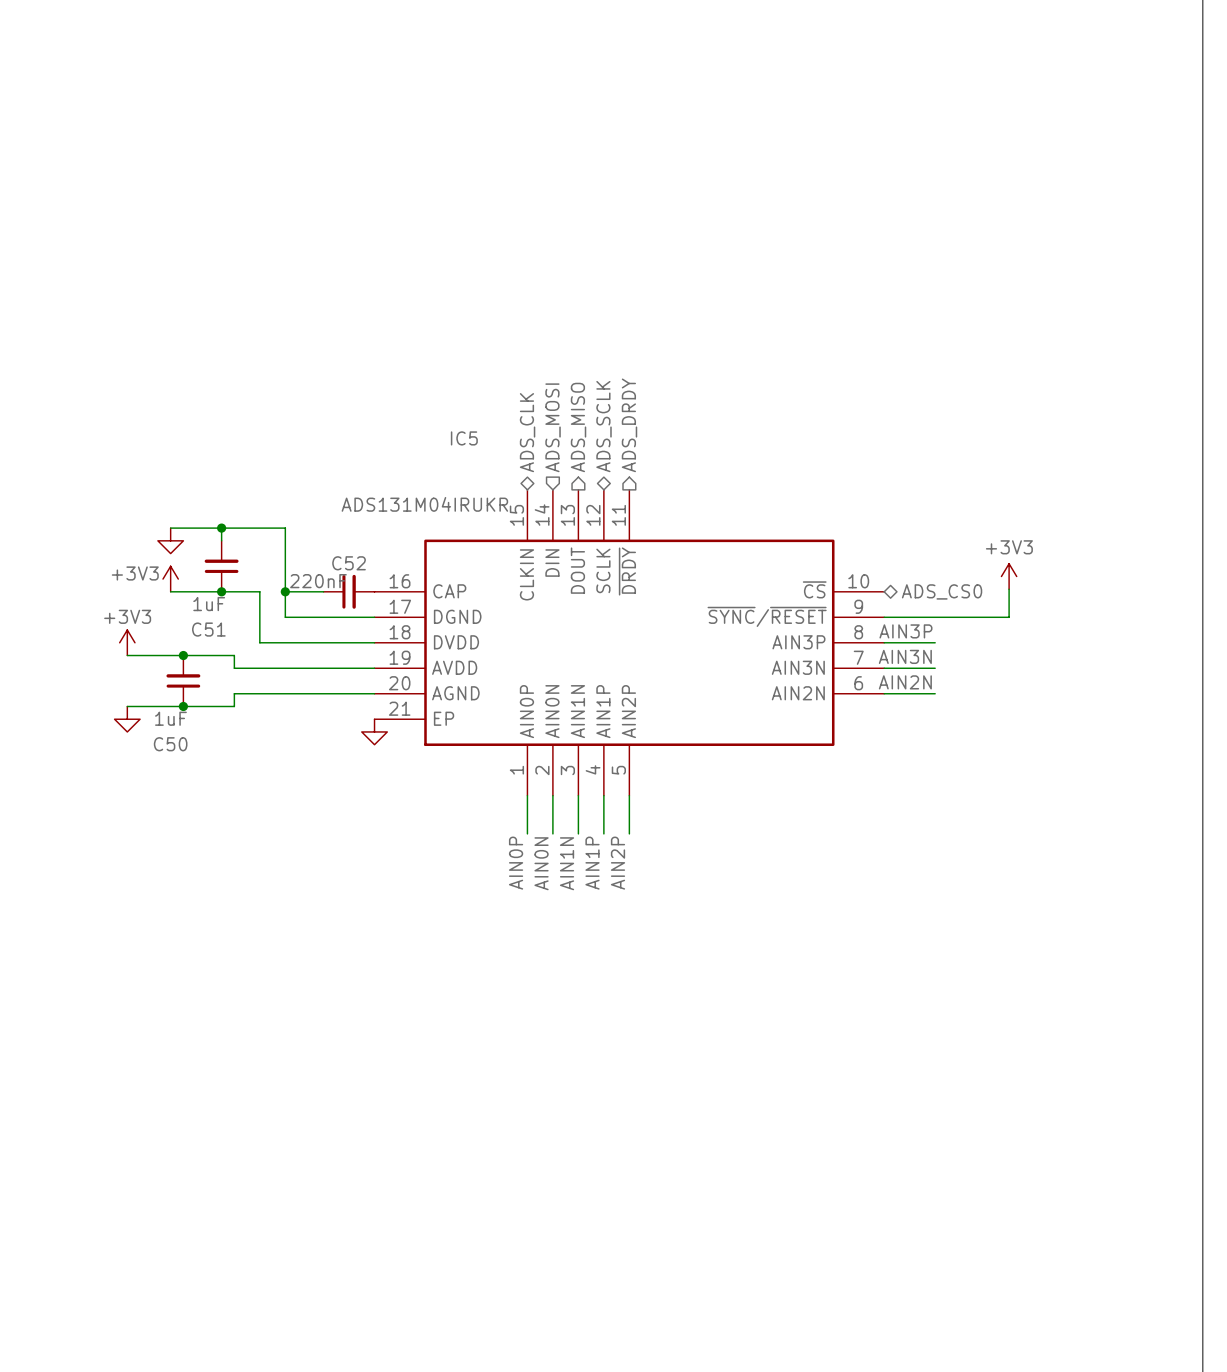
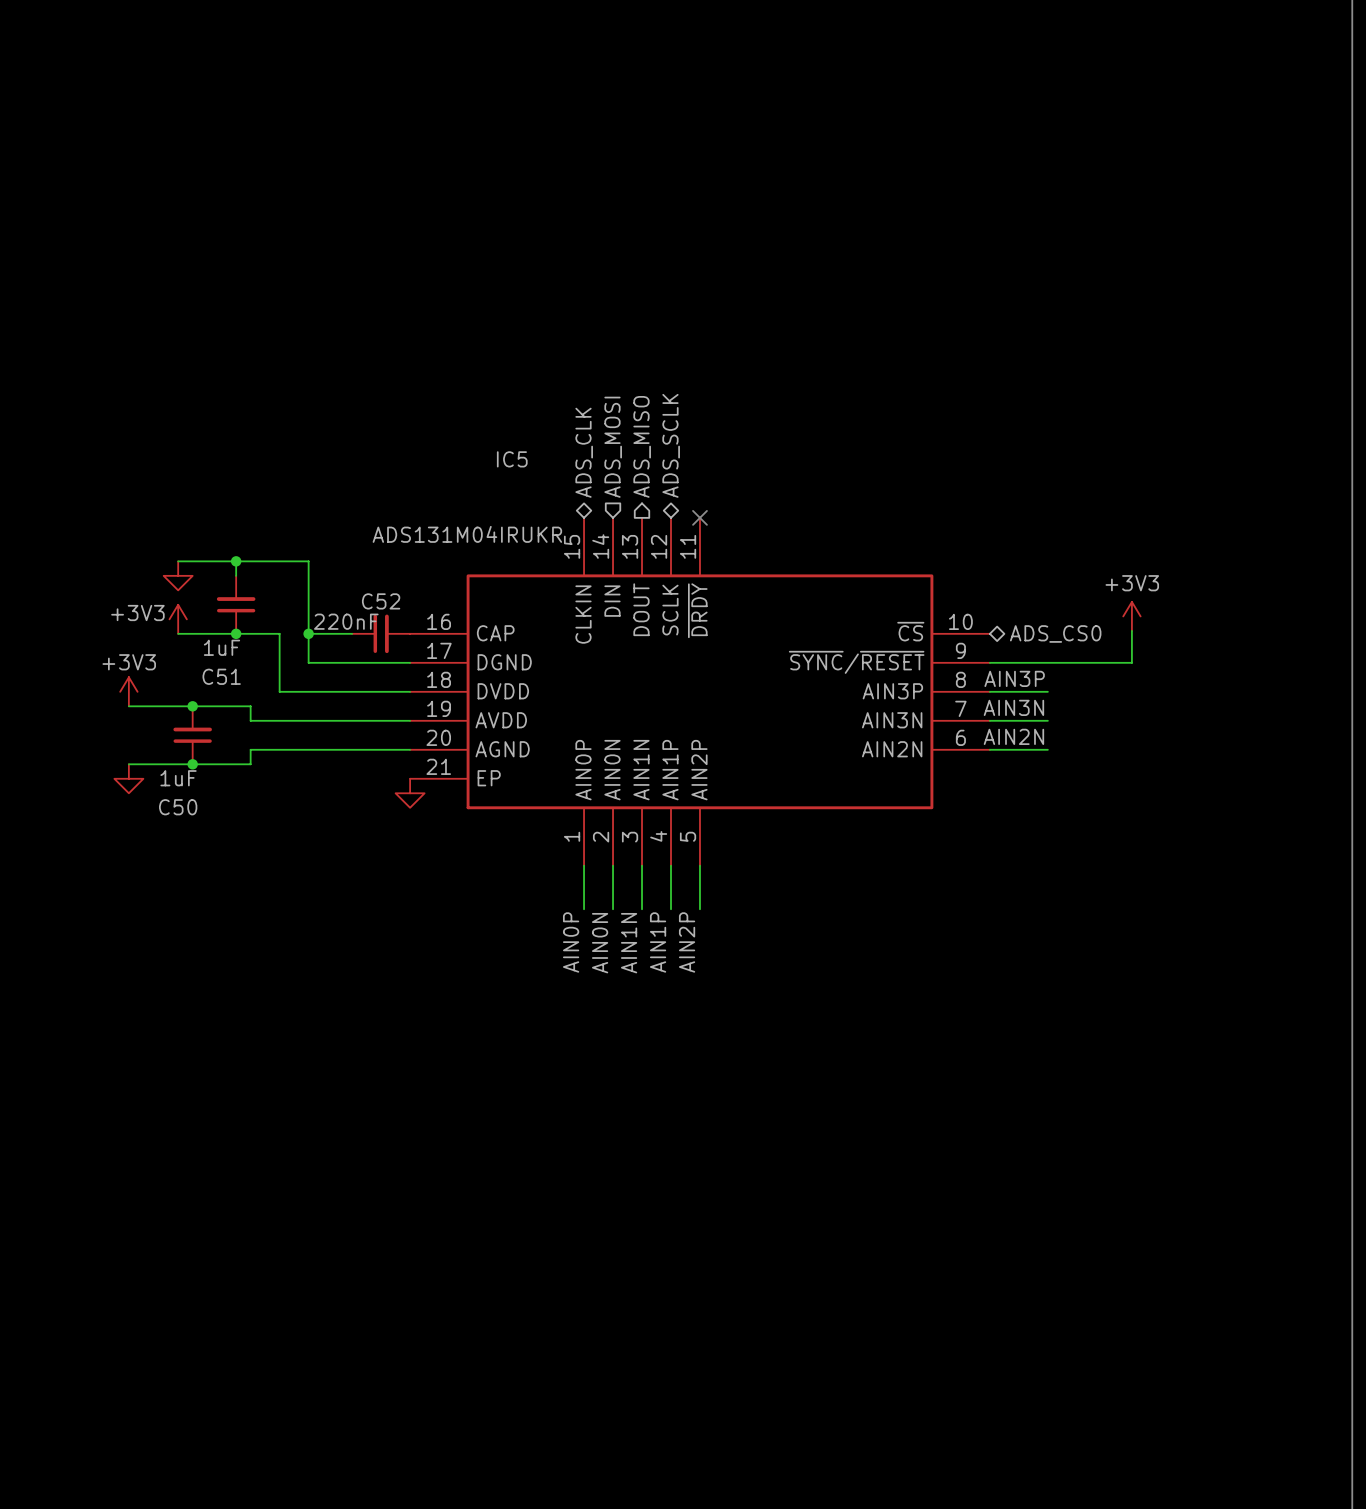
hierarchical label: ADS_DRDY (629, 425) -> none
no-connect mark: none -> (699, 517)

